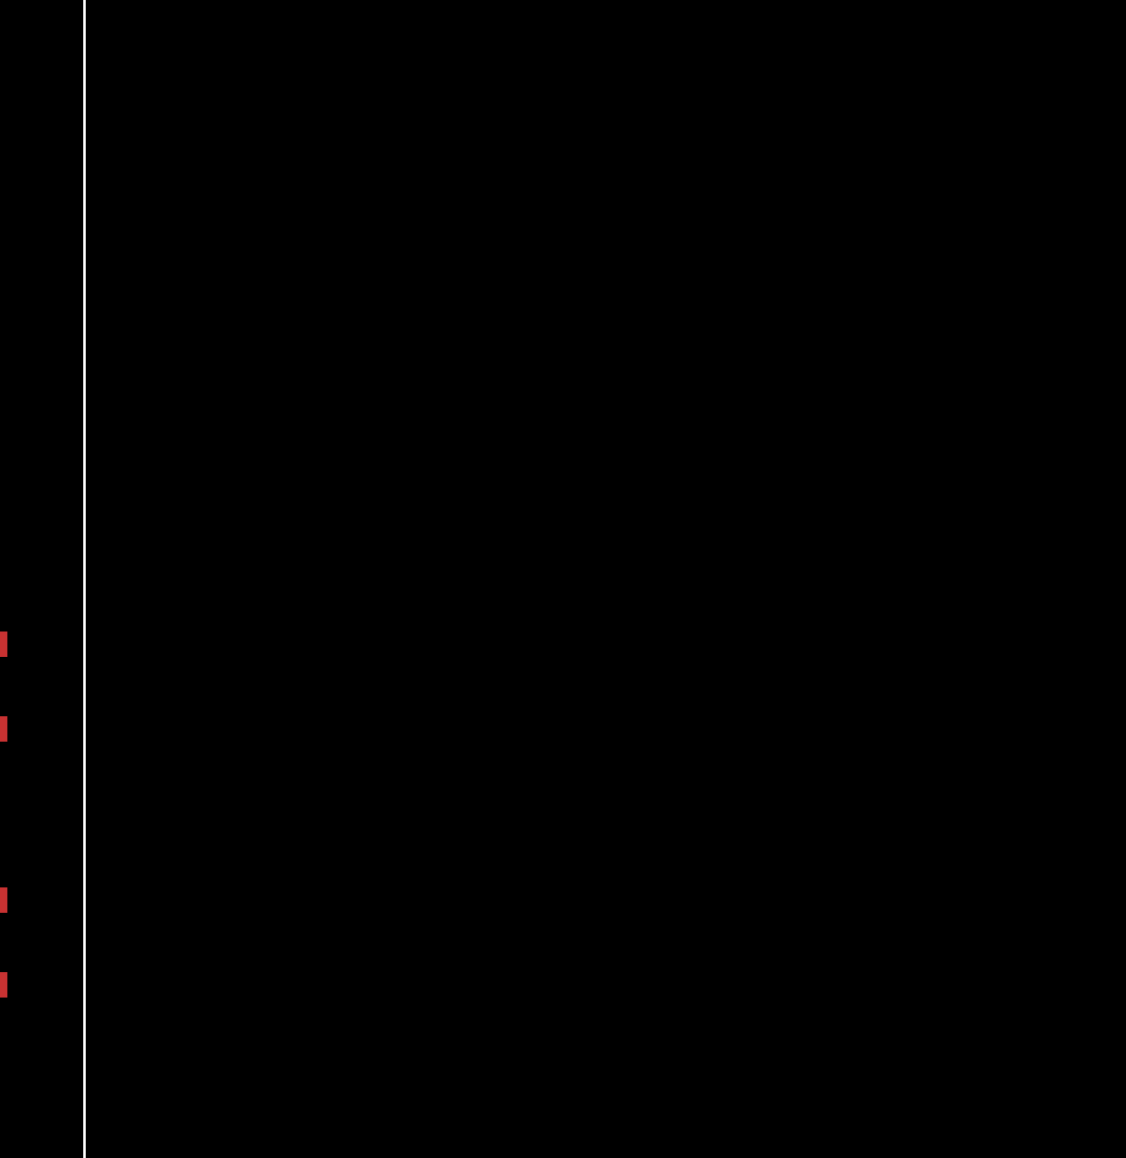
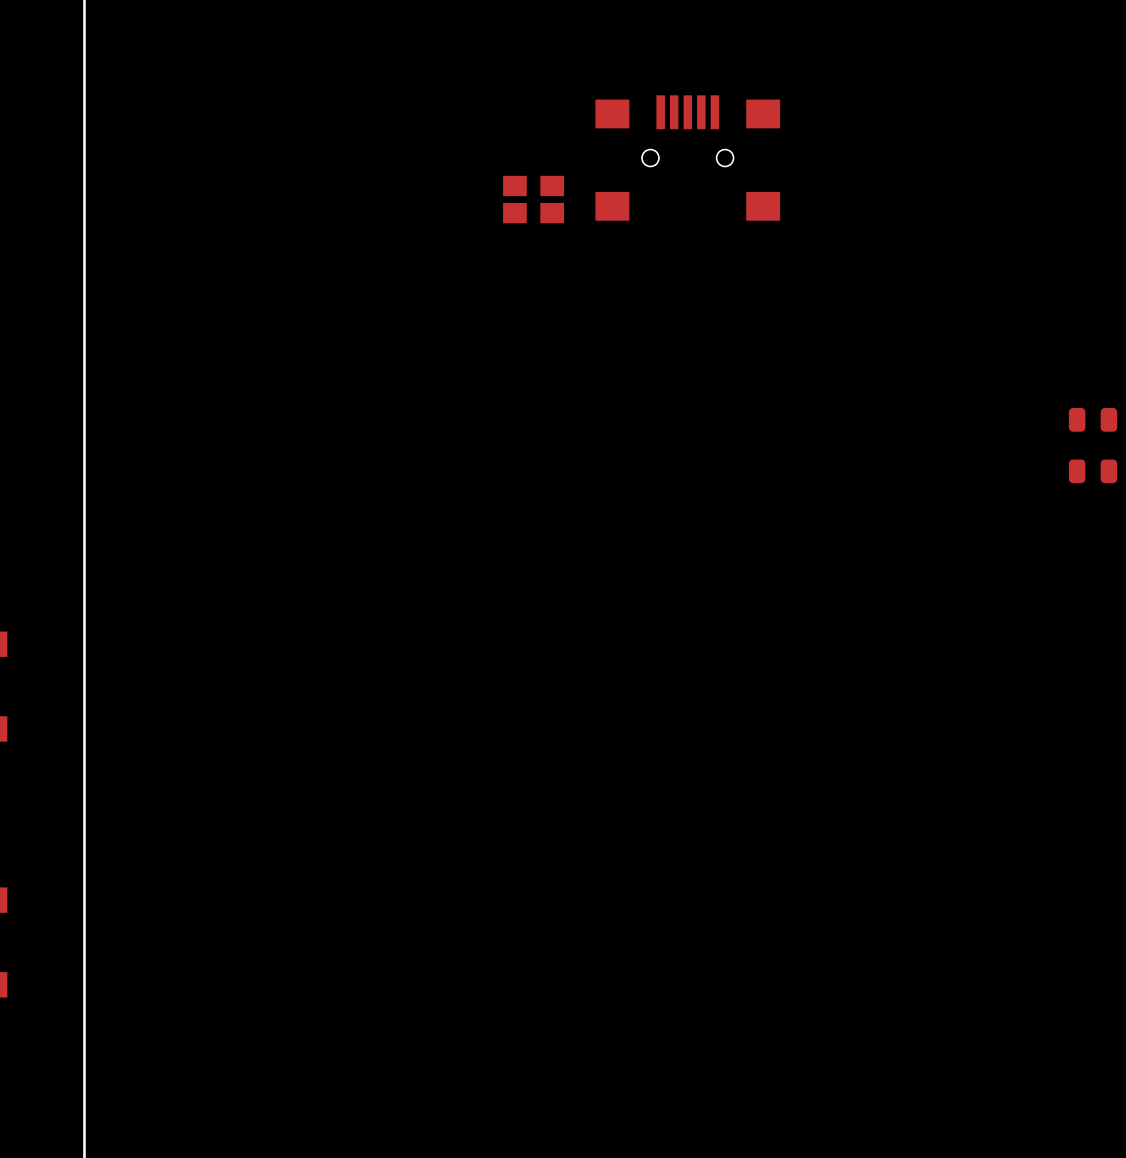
part: none -> (687, 158)
part: none -> (533, 199)
part: none -> (1093, 419)
part: none -> (1093, 471)

